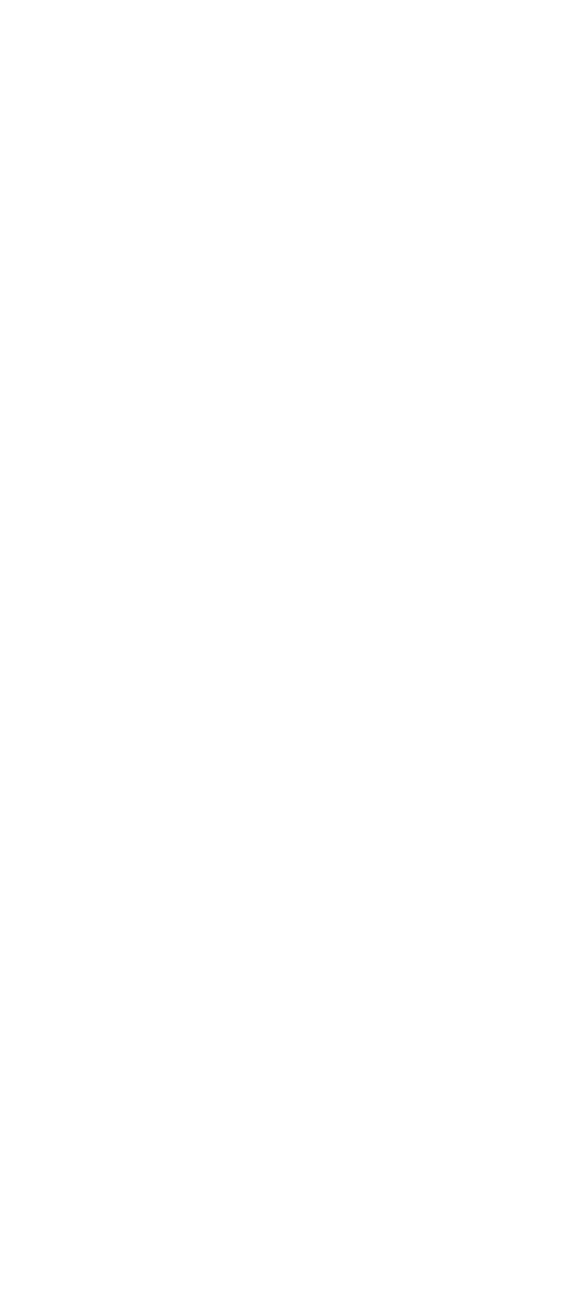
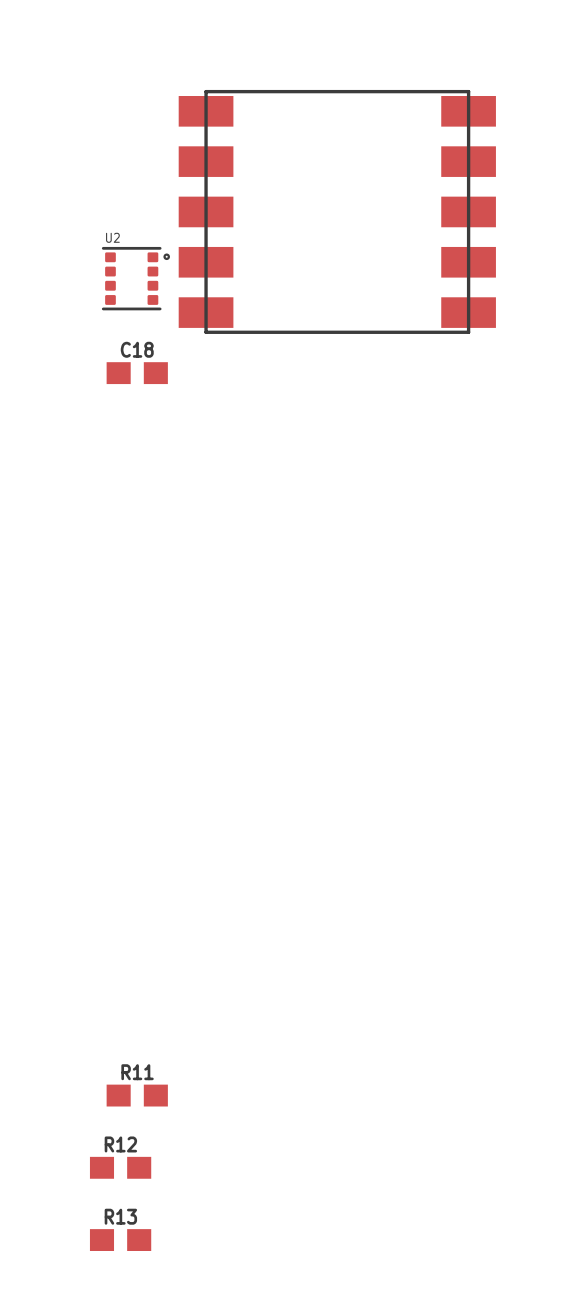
part: none -> (337, 211)
U2: none -> (135, 278)
C18: none -> (137, 373)
R11: none -> (137, 1095)
R12: none -> (120, 1167)
R13: none -> (120, 1240)

